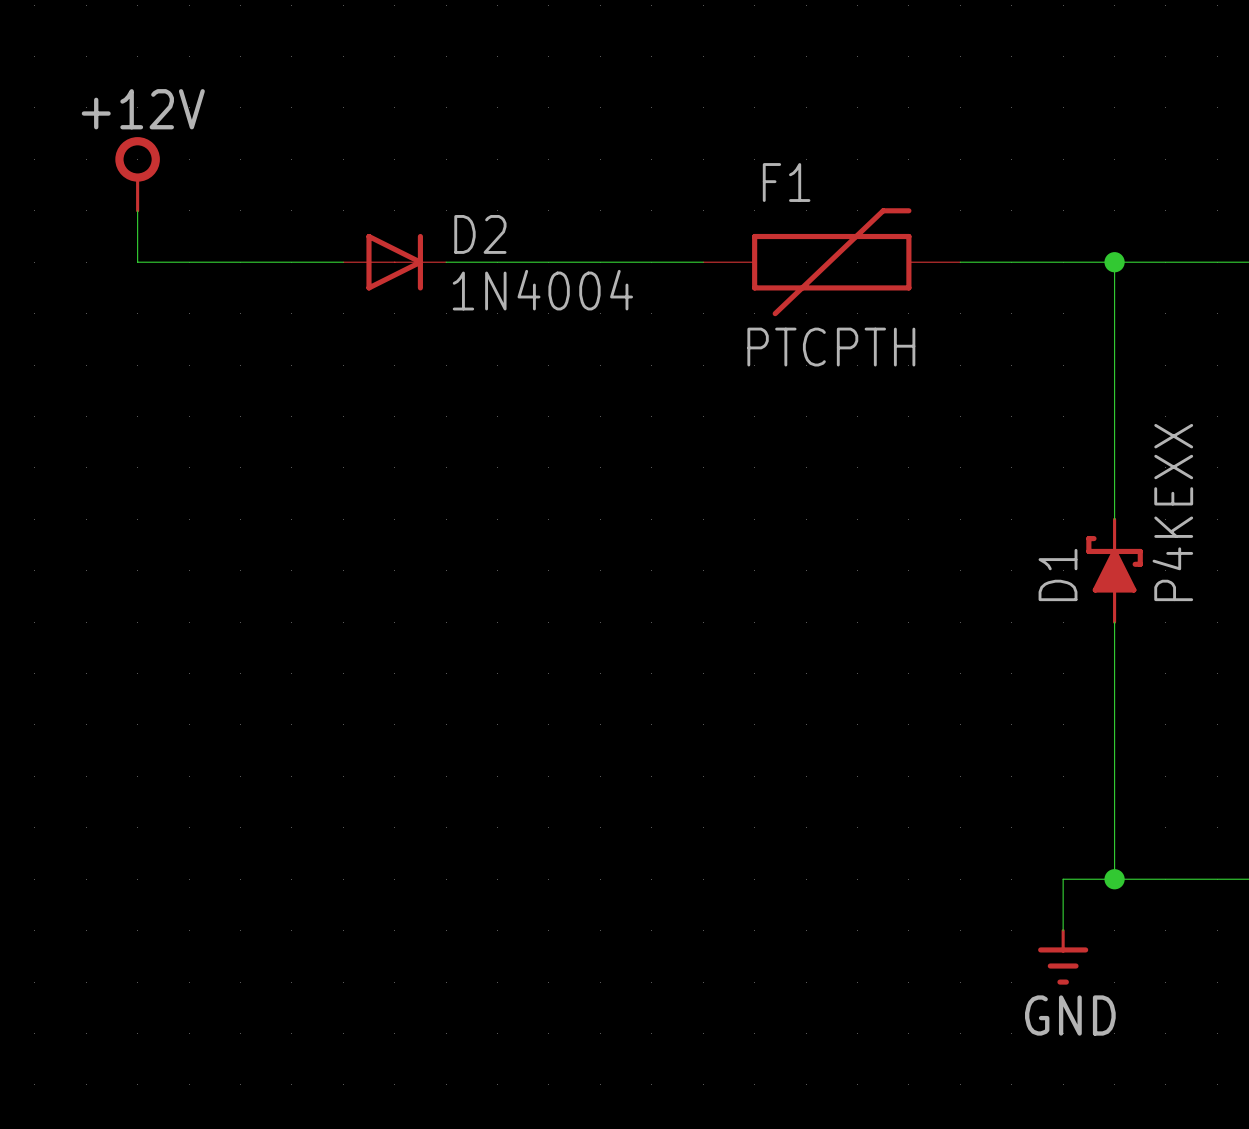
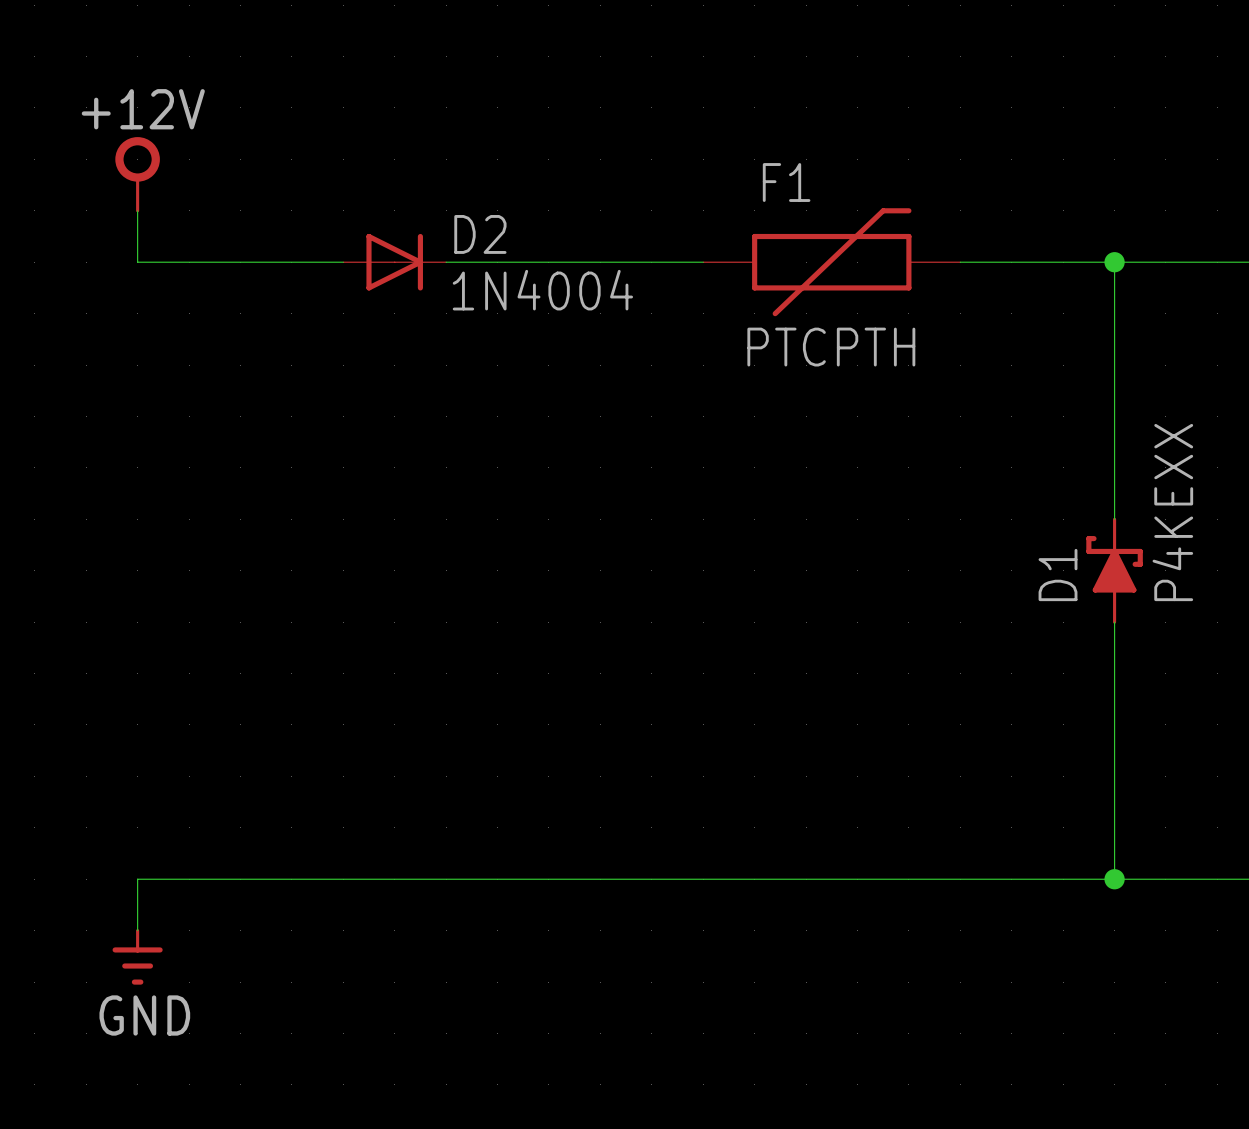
wire: (1063, 879) (1063, 930) -> (1063, 879) (137, 879) (137, 930)
power symbol: none -> GND (137, 956)
power symbol: GND (1063, 956) -> none

